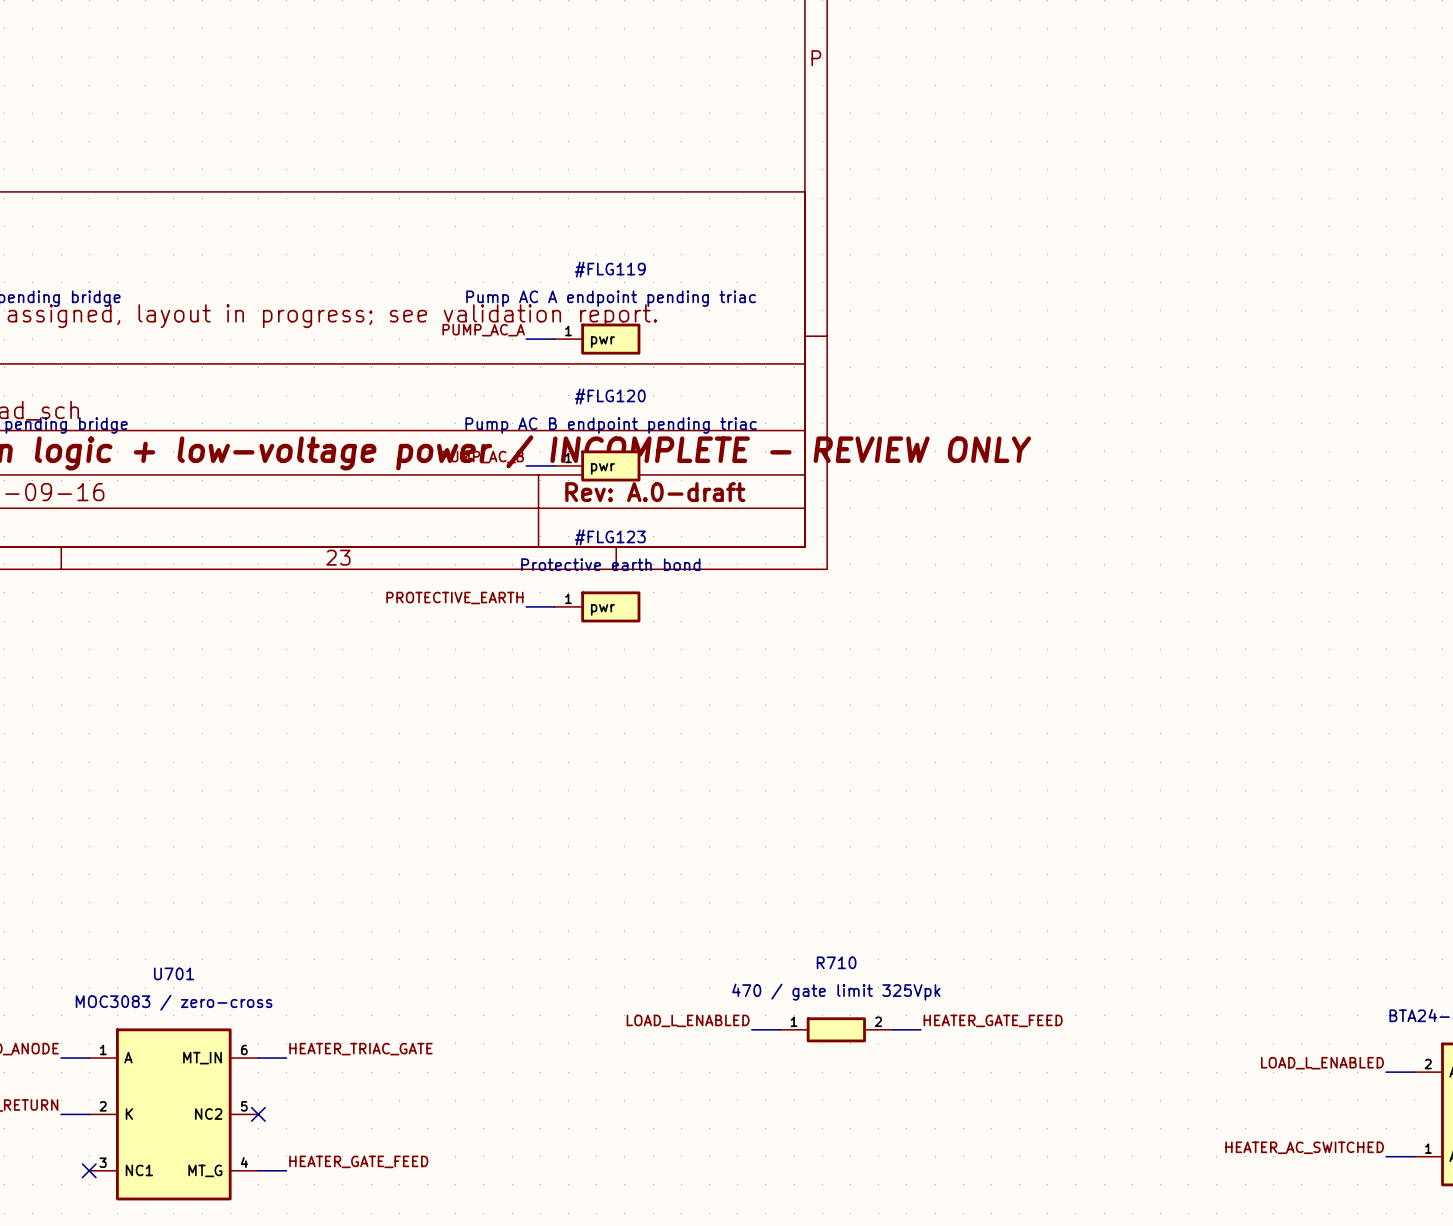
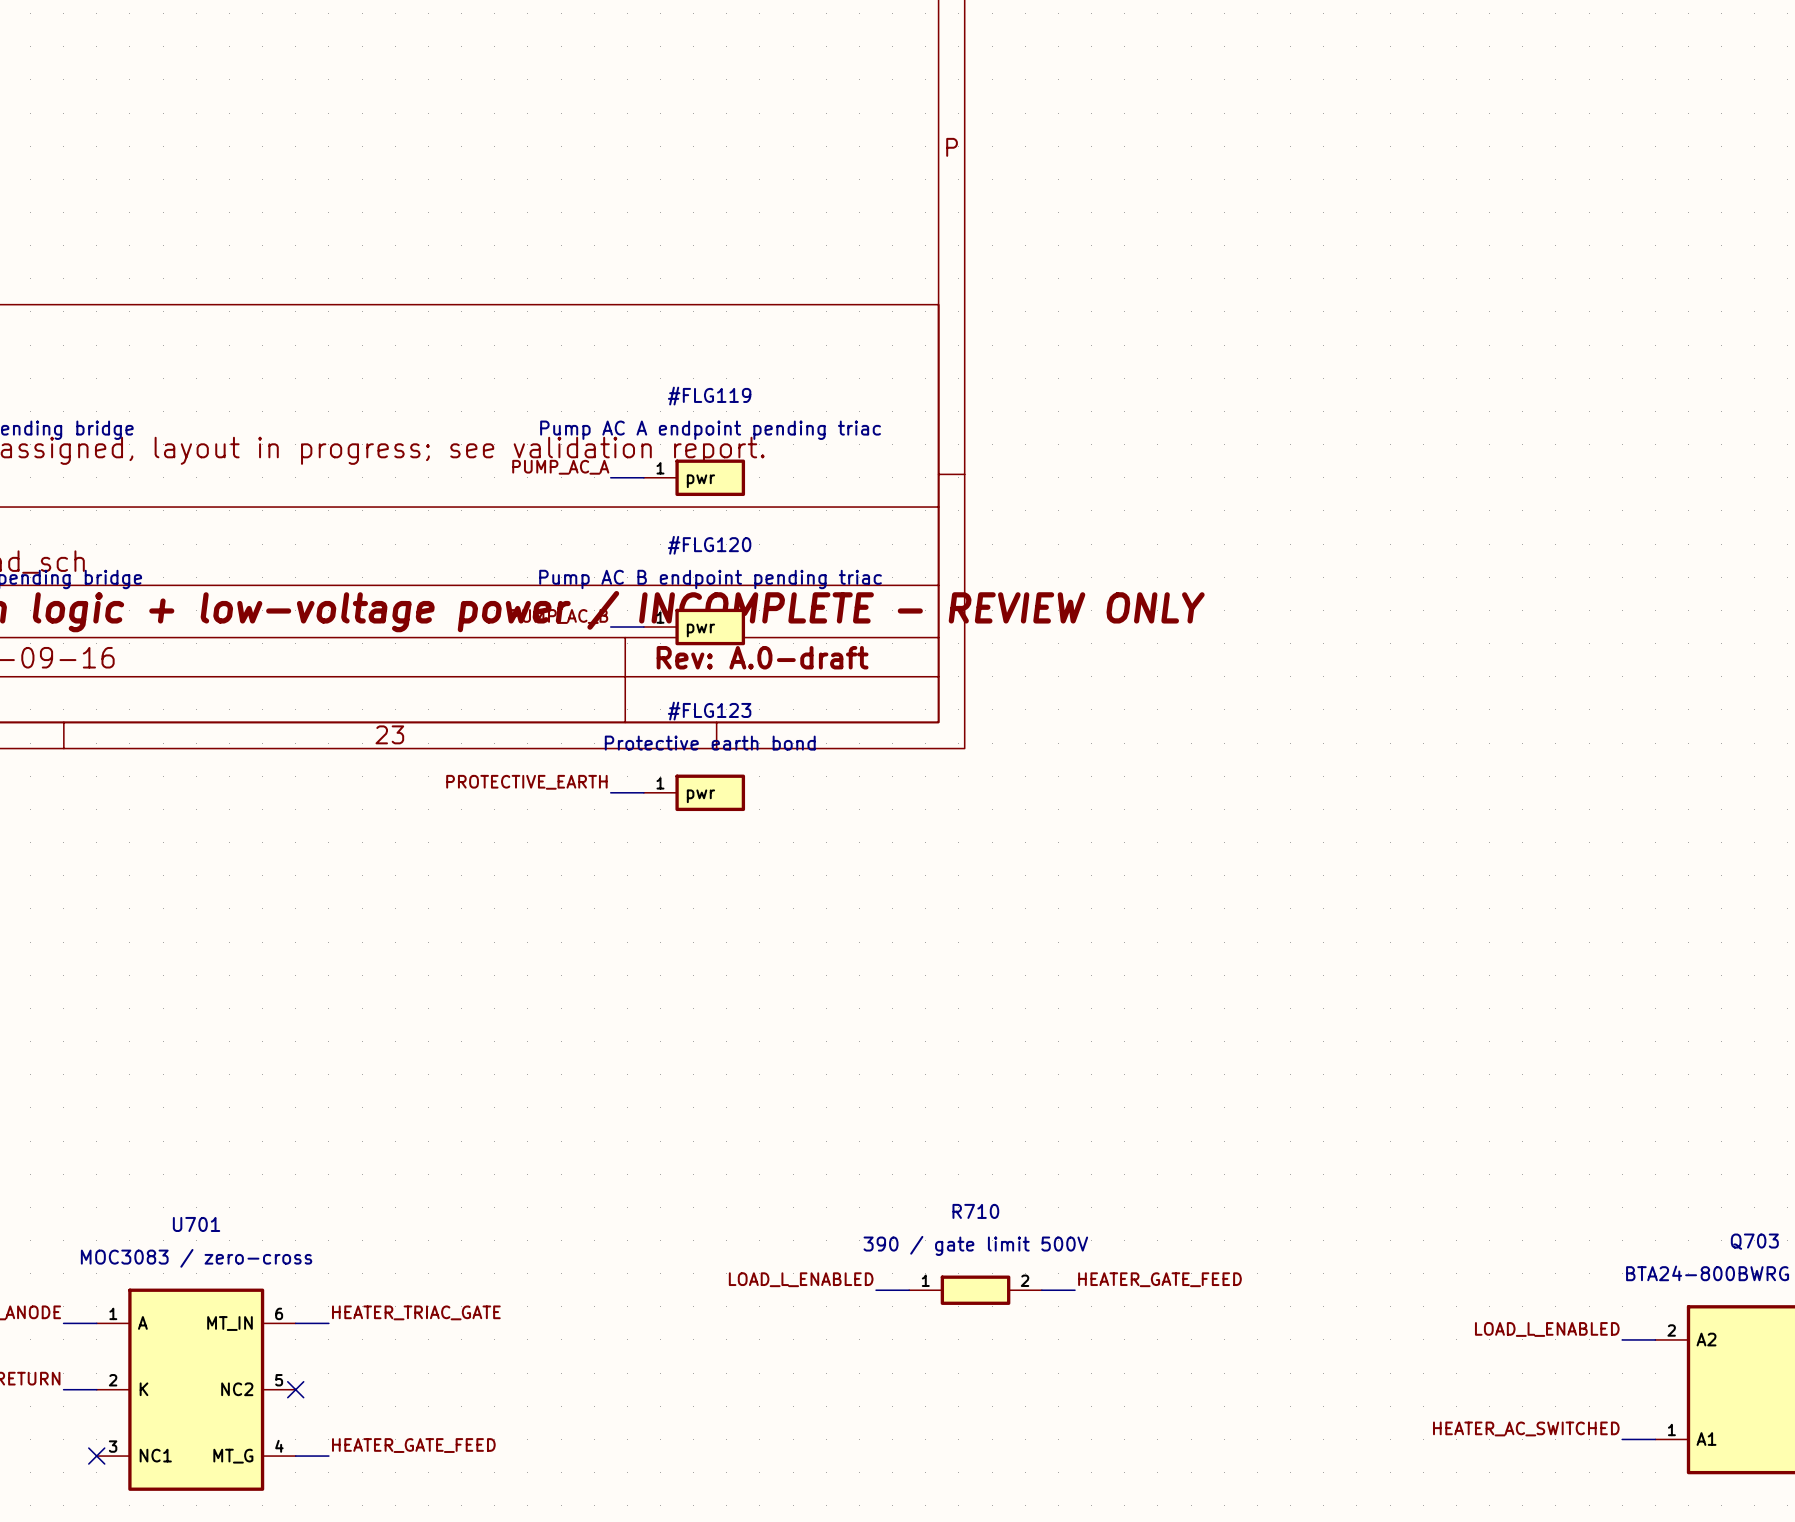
R710 value: 470 / gate limit 325Vpk (836, 992) -> 390 / gate limit 500V (975, 1245)

